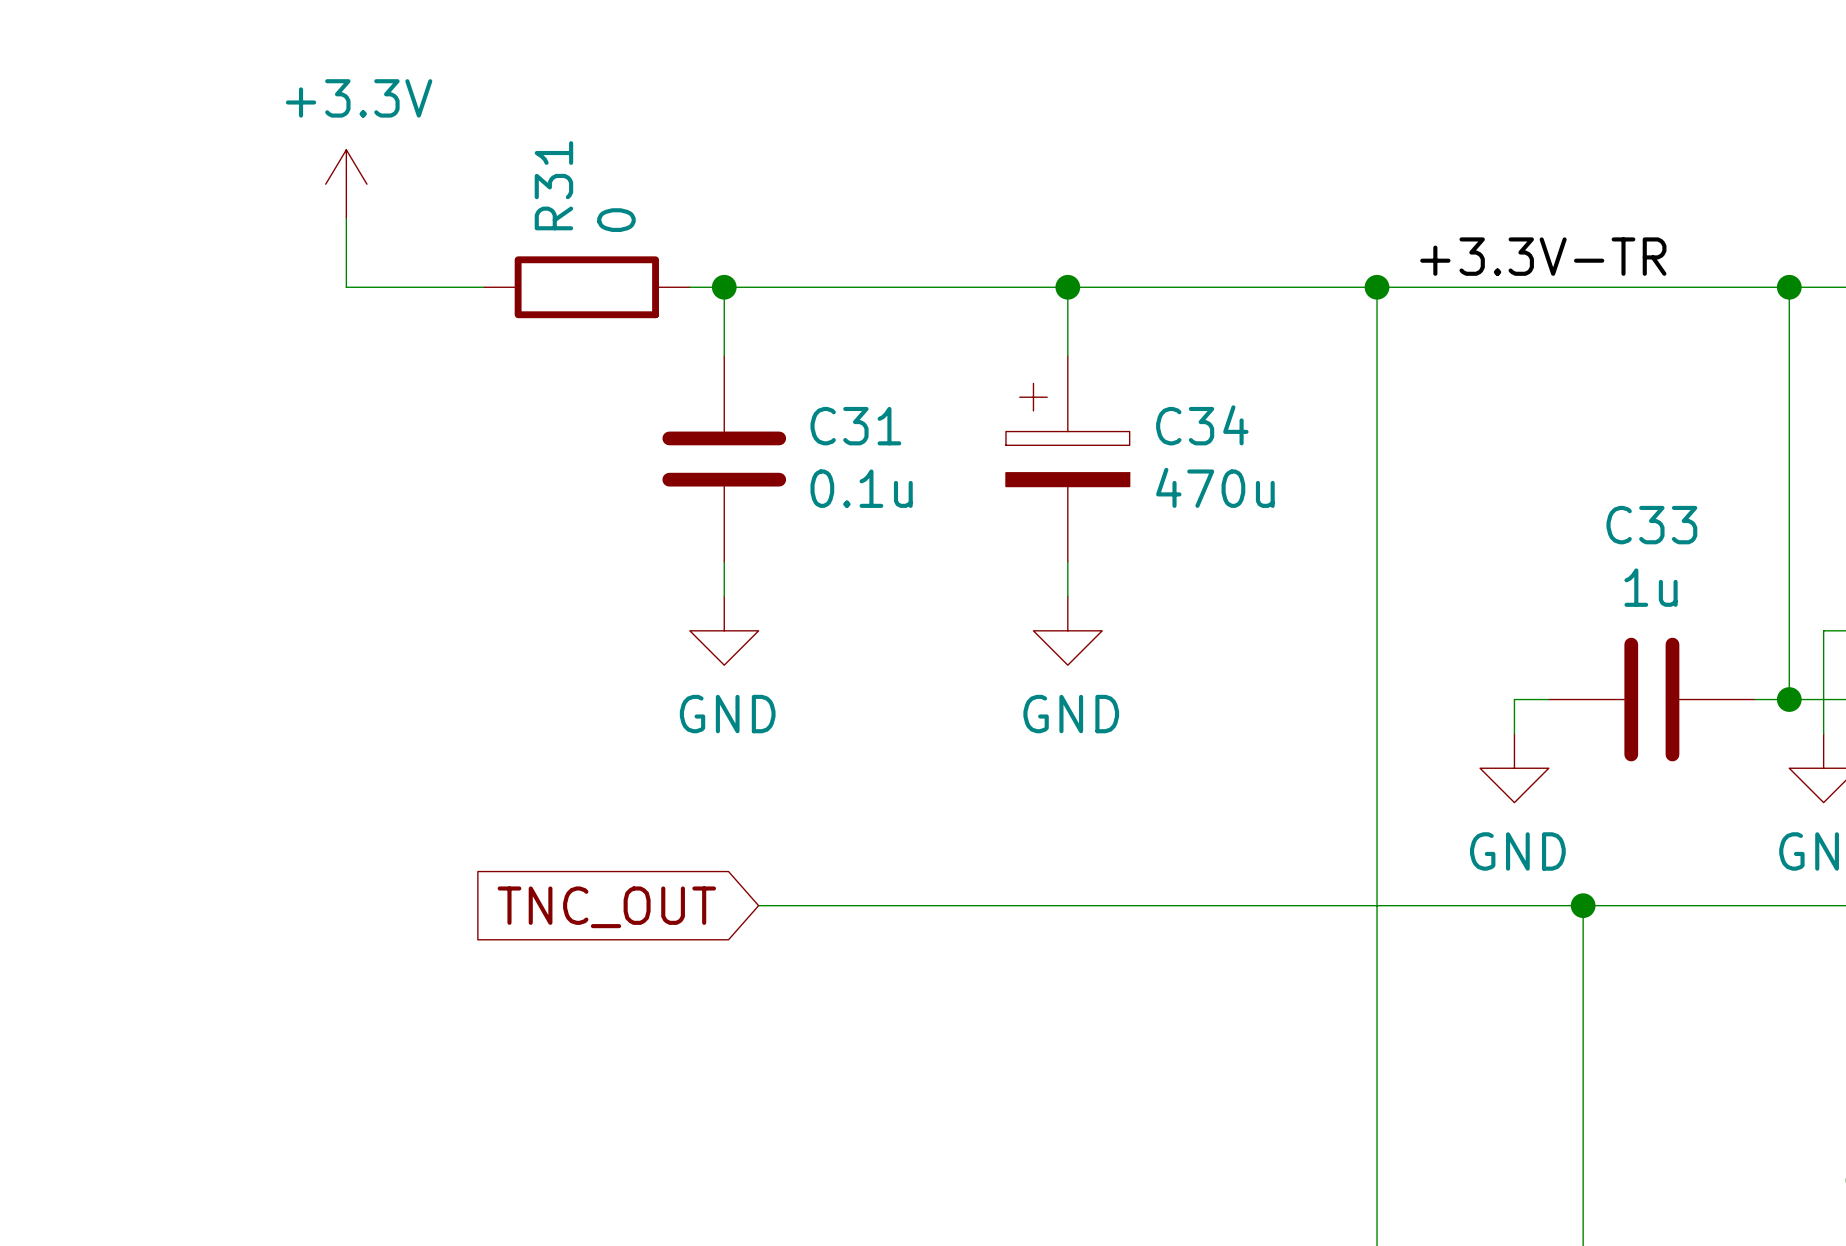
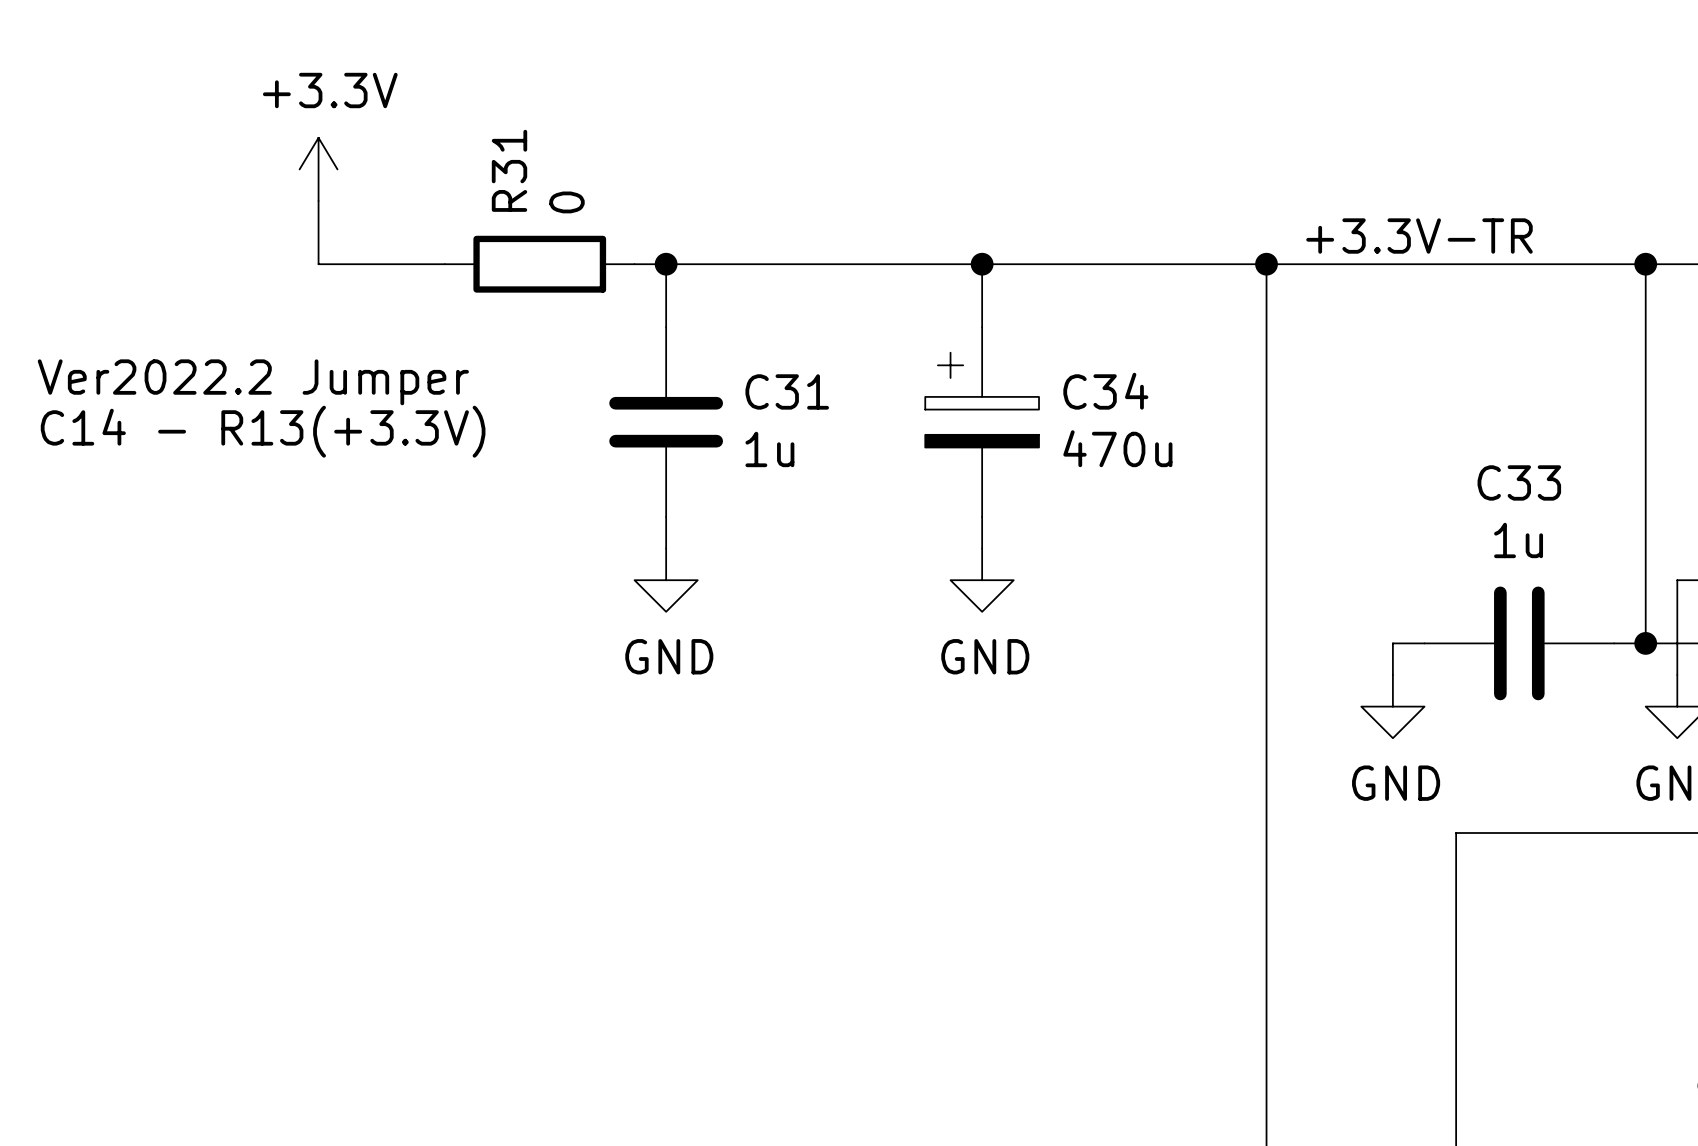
text: none -> Ver2022.2 Jumper (253, 382)
text: none -> C14 - R13(+3.3V) (263, 431)
C31 value: 0.1u (861, 488) -> 1u (769, 449)
wire: (758, 905) (1583, 905) -> none
junction: (1583, 905) -> none
global label: TNC_OUT (606, 907) -> none

